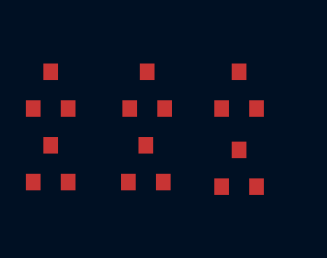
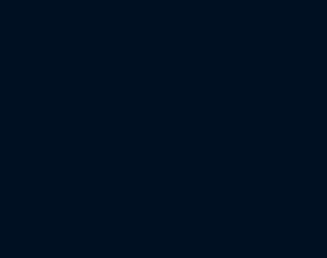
part: (50, 90) -> none
part: (147, 90) -> none
part: (239, 90) -> none
part: (50, 163) -> none
part: (145, 163) -> none
part: (239, 168) -> none

